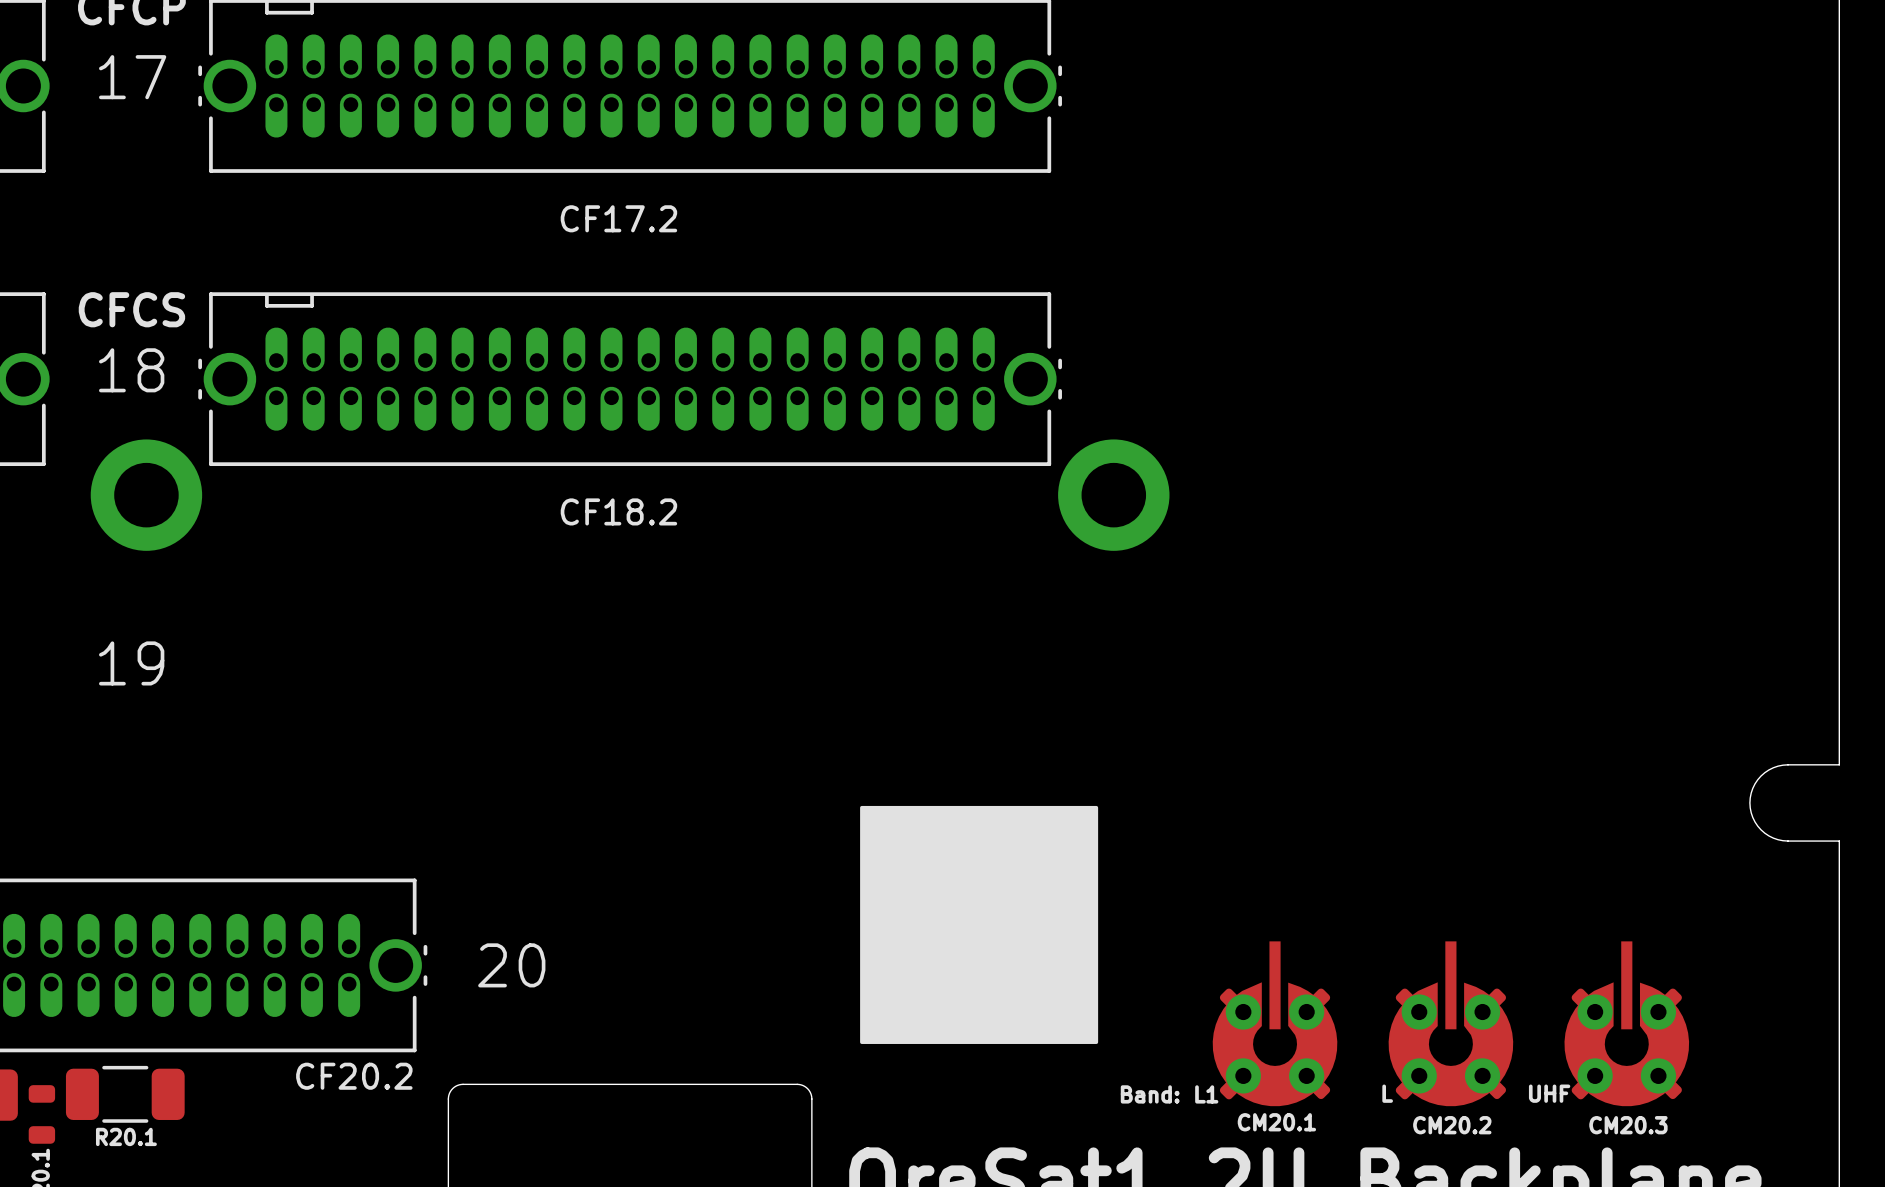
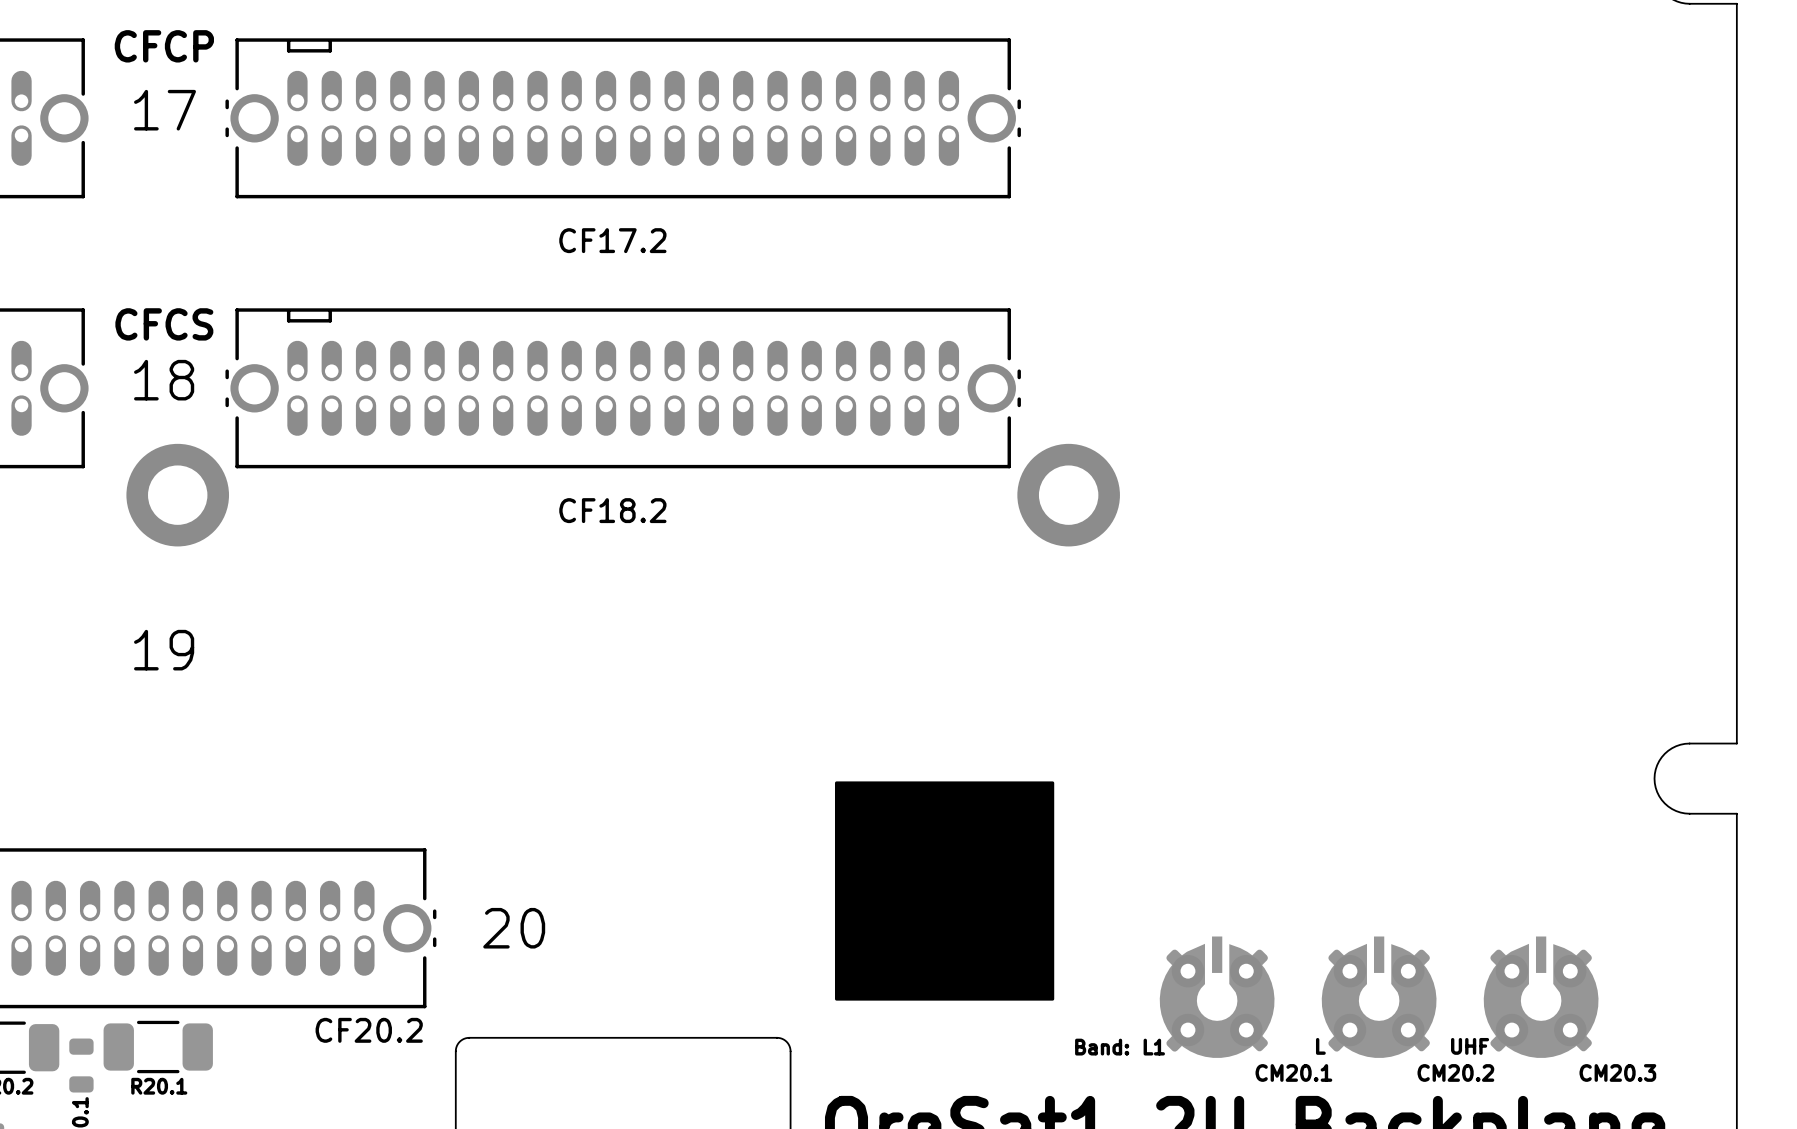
CM20.1 footprint: [1212, 941, 1338, 1107] -> [1159, 936, 1275, 1058]
CM20.2 footprint: [1388, 941, 1514, 1107] -> [1321, 936, 1437, 1058]
CM20.3 footprint: [1564, 941, 1690, 1107] -> [1483, 936, 1599, 1058]
CM20.1 name position: CM20.1 (1276, 1122) -> CM20.1 (1293, 1072)
CM20.2 name position: CM20.2 (1452, 1125) -> CM20.2 (1455, 1072)
CM20.3 name position: CM20.3 (1628, 1125) -> CM20.3 (1617, 1072)

